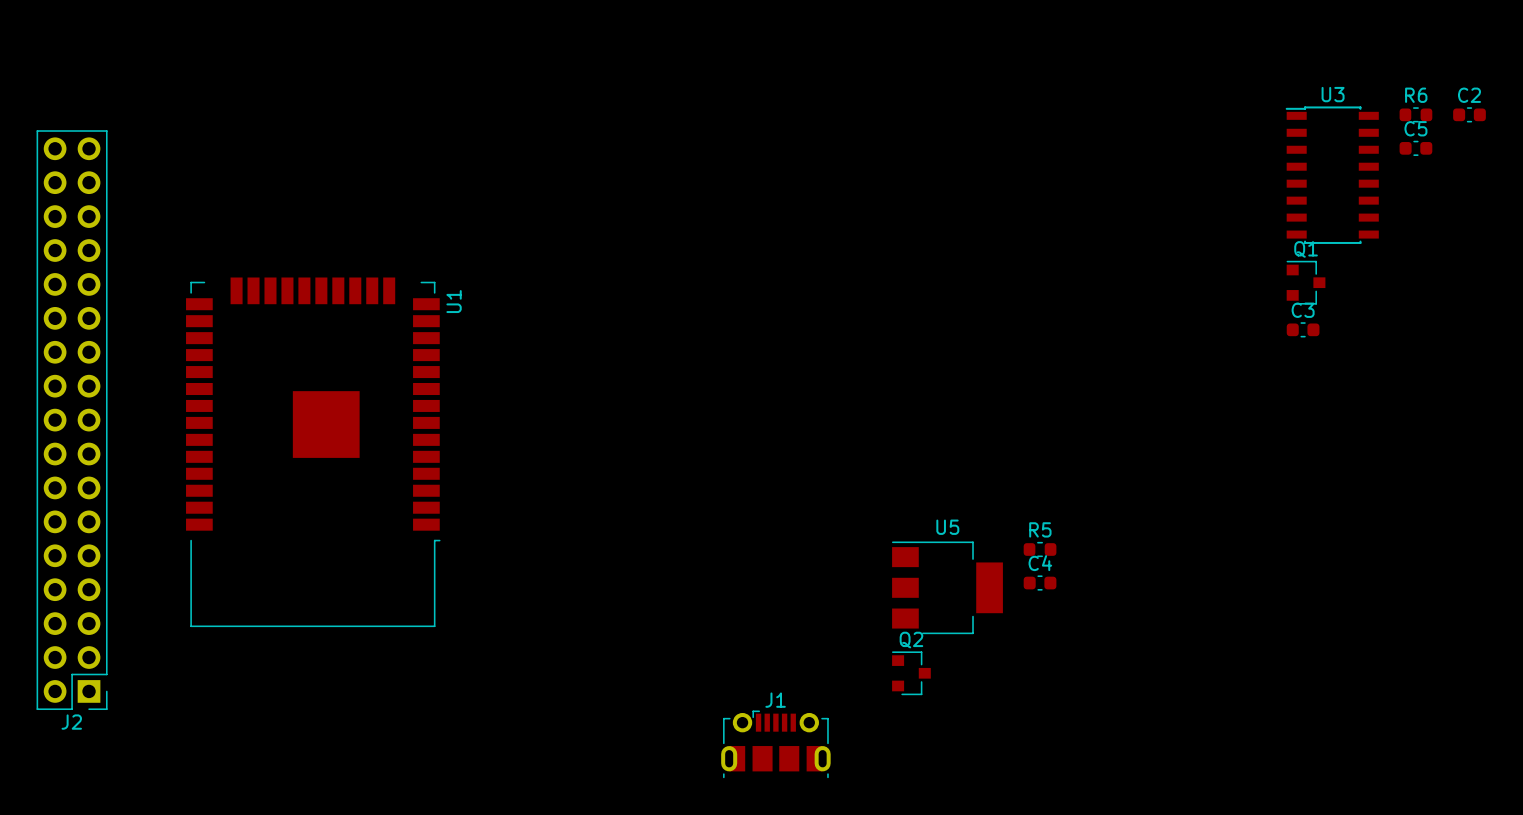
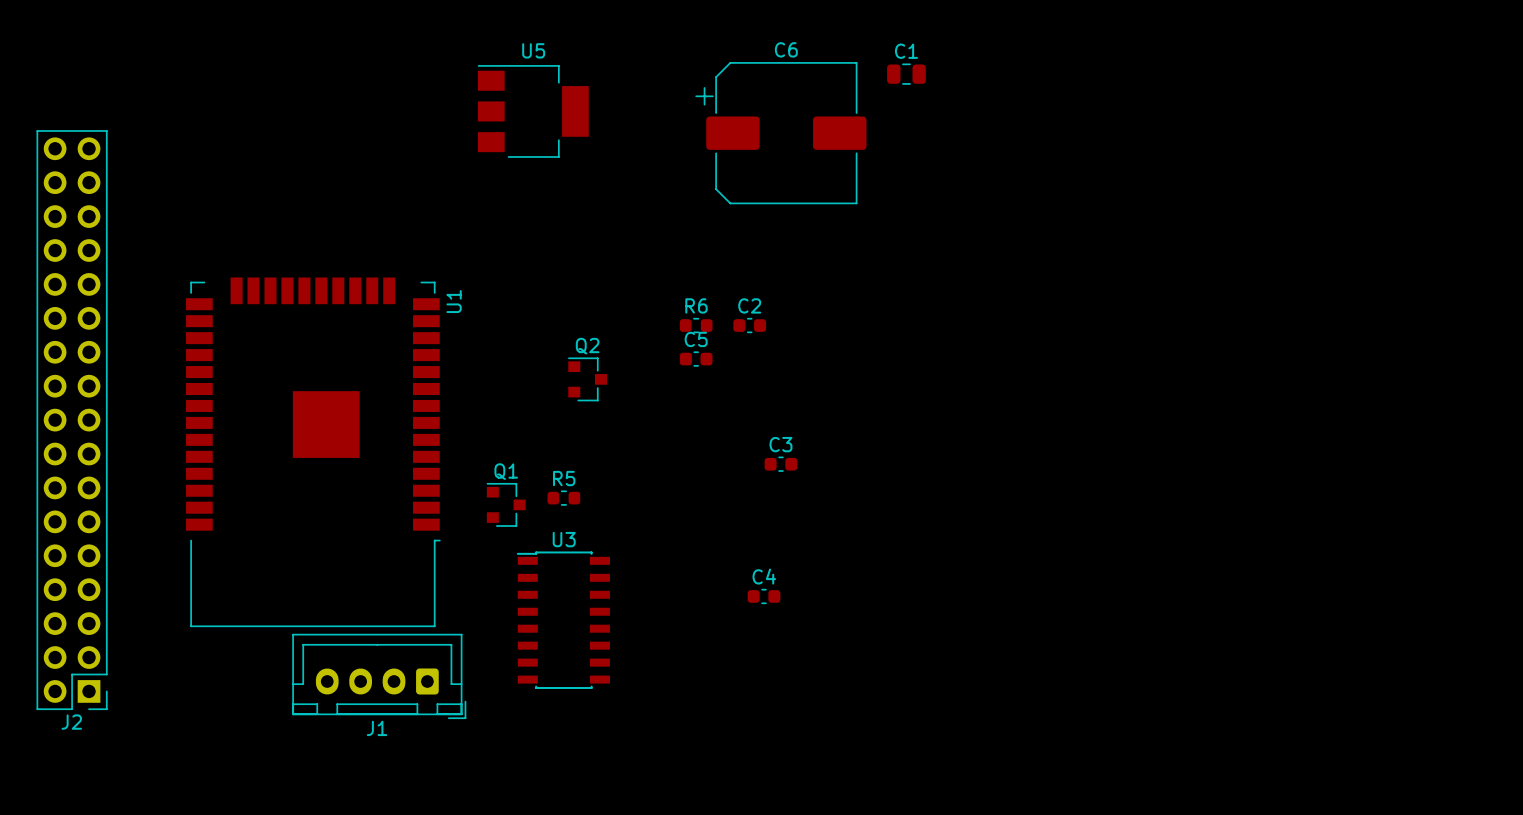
C1: none -> (906, 74)
R6 position: (1415, 114) -> (696, 325)
C2 position: (1469, 114) -> (749, 325)
C6: none -> (780, 133)
C5 position: (1415, 148) -> (696, 359)
U3 position: (1332, 175) -> (563, 620)
Q1 position: (1305, 282) -> (506, 504)
C3 position: (1303, 329) -> (780, 464)
R5 position: (1040, 549) -> (563, 498)
C4 position: (1040, 583) -> (763, 596)
U5 position: (947, 587) -> (533, 111)
Q2 position: (911, 673) -> (587, 379)
J1 name position: J1 (775, 700) -> J1 (377, 728)
J1 footprint: [721, 710, 831, 779] -> [292, 633, 467, 720]

